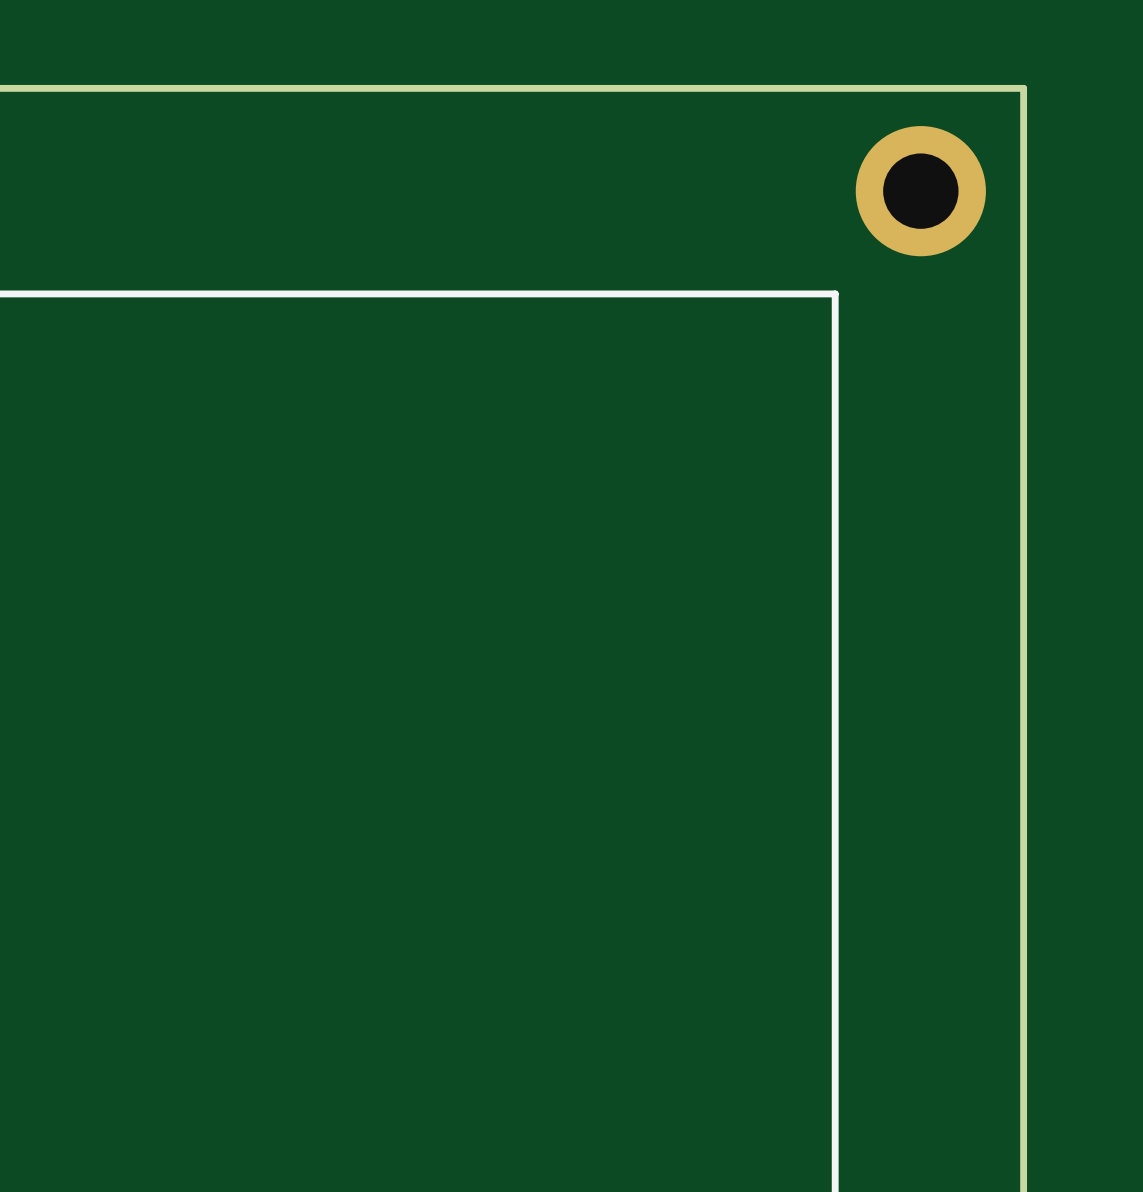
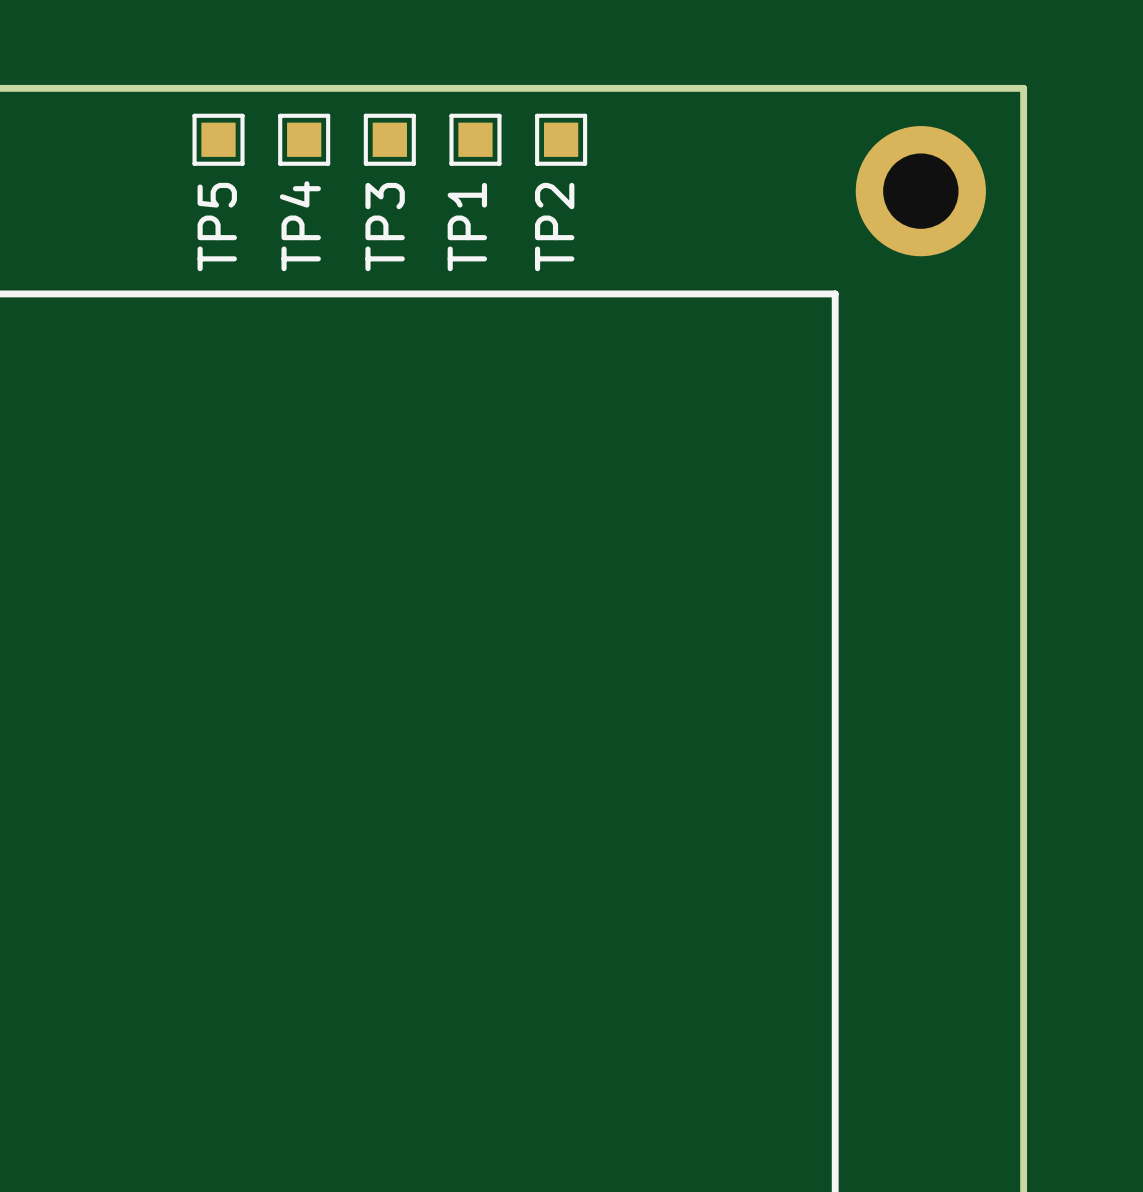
TP5: none -> (218, 139)
TP4: none -> (304, 139)
TP3: none -> (389, 139)
TP1: none -> (475, 139)
TP2: none -> (561, 139)

